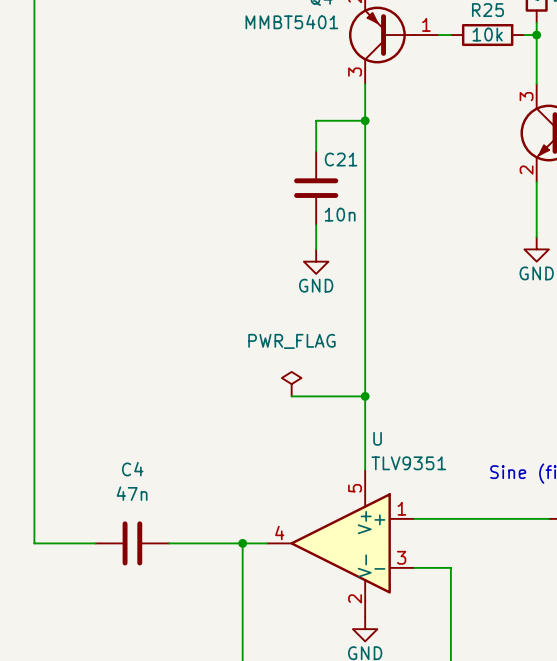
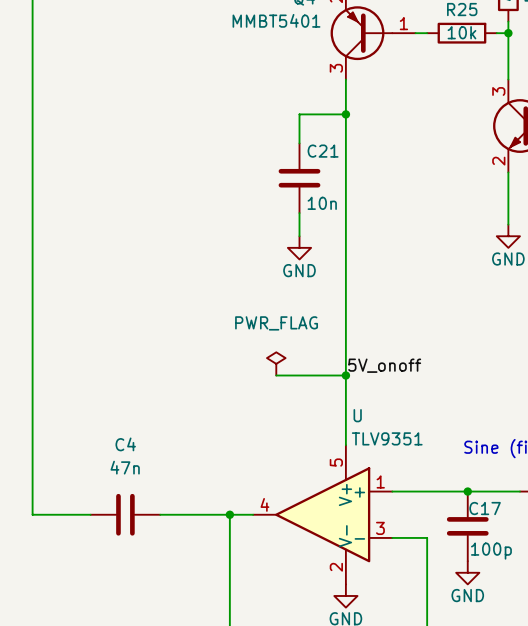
label: none -> 5V_onoff (384, 365)
junction: none -> (467, 491)
C17: none -> 100p (467, 526)
power symbol: none -> GND (467, 572)

